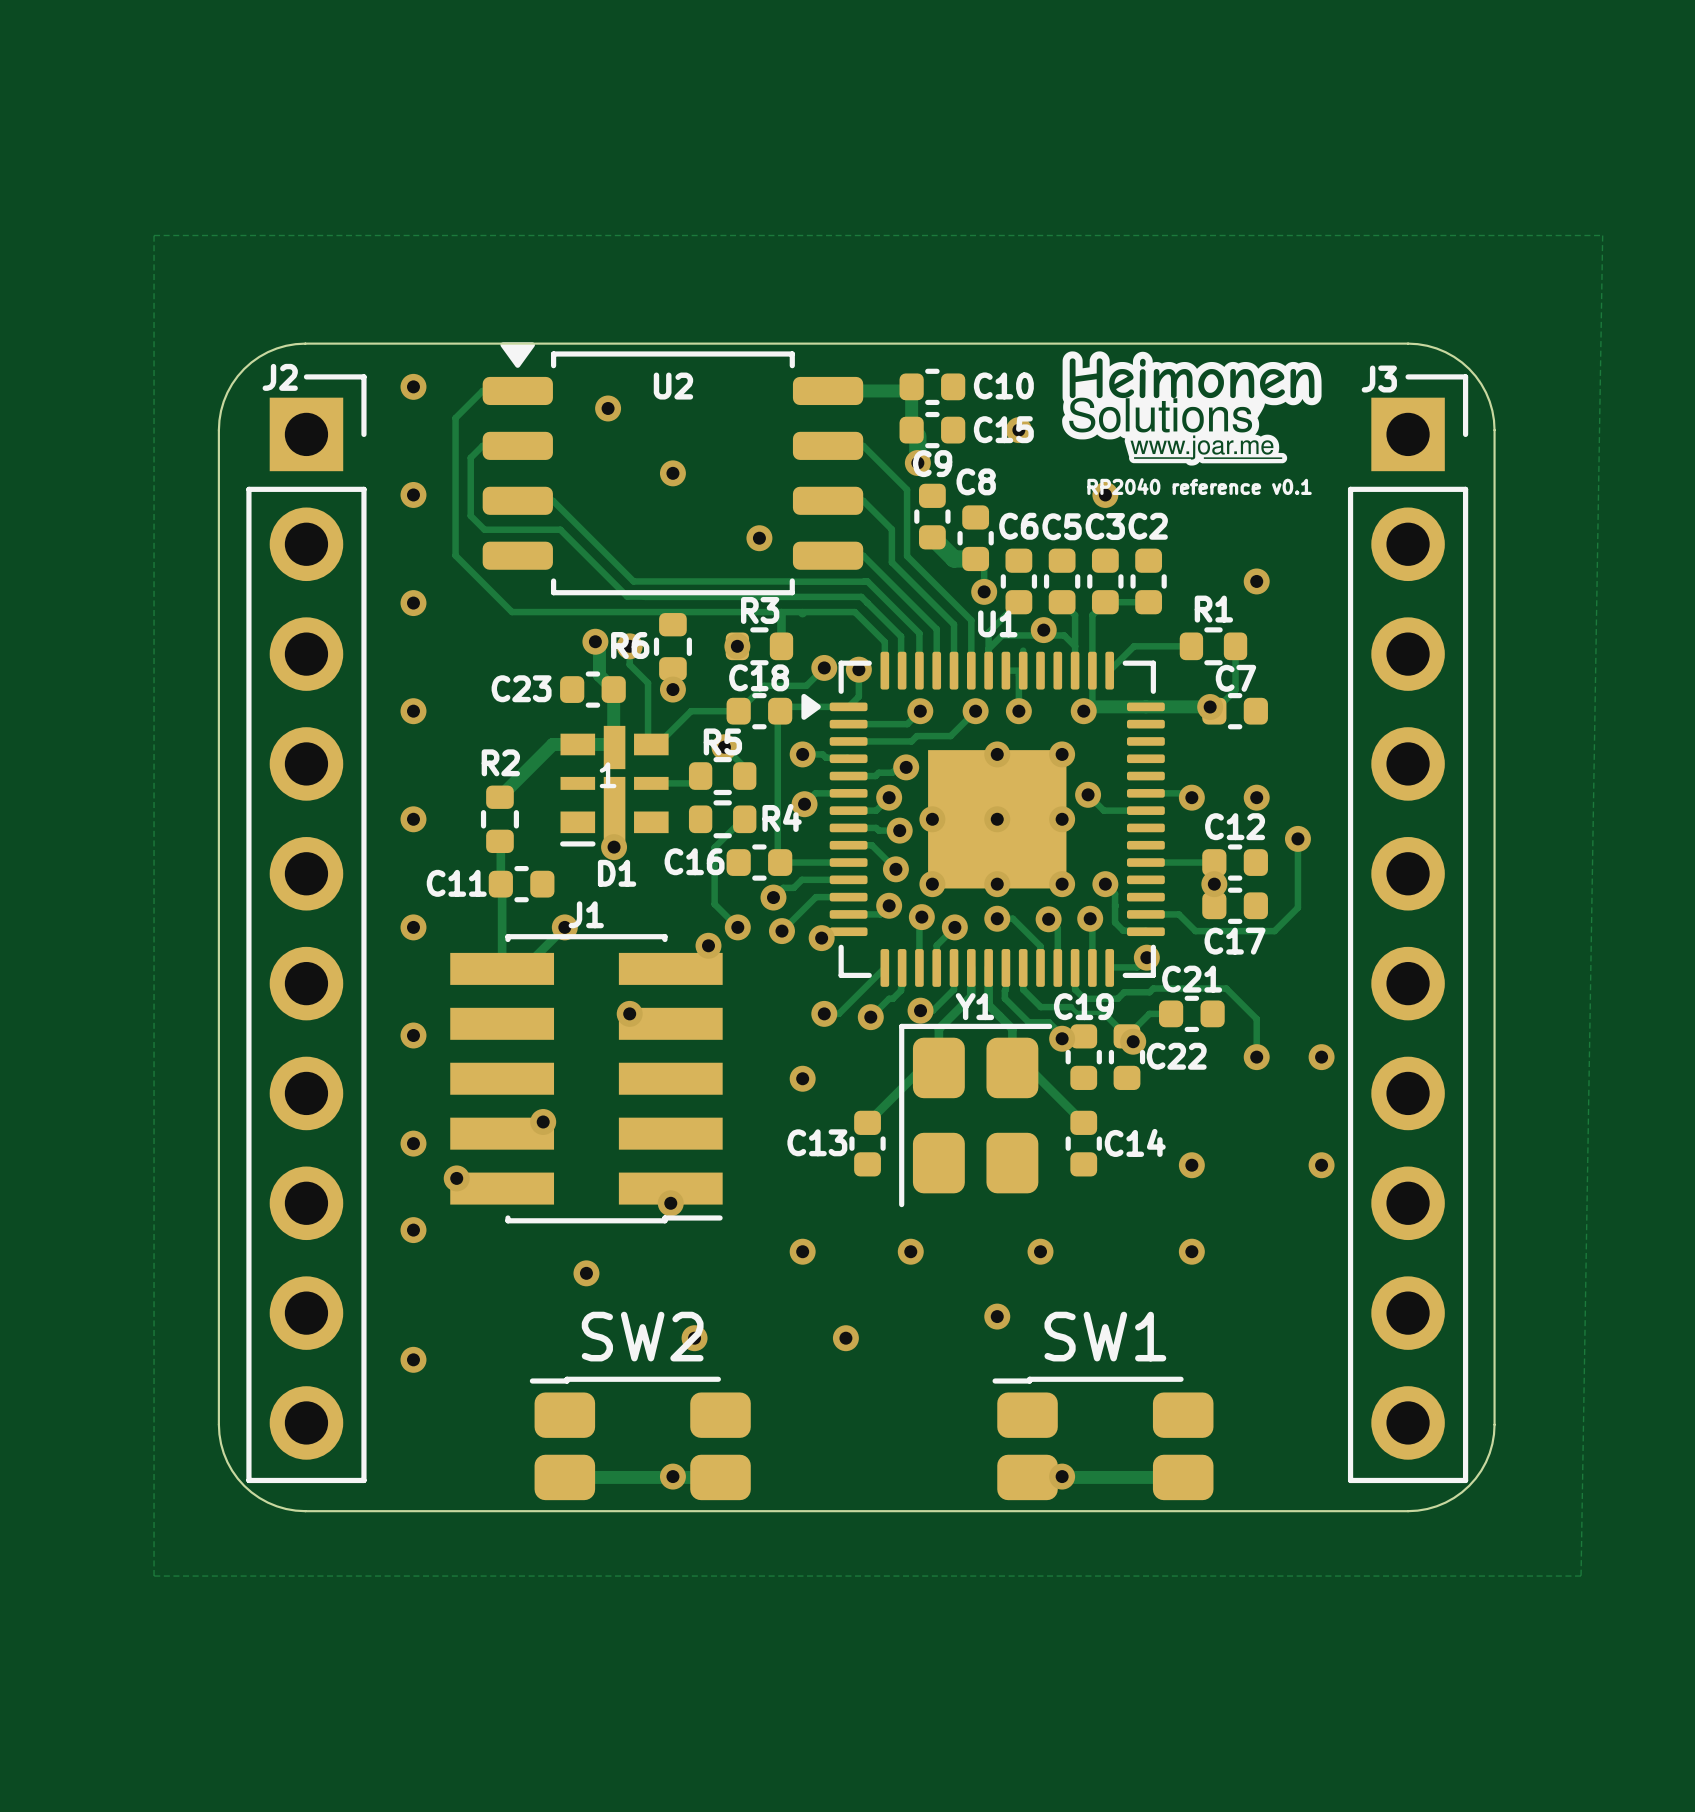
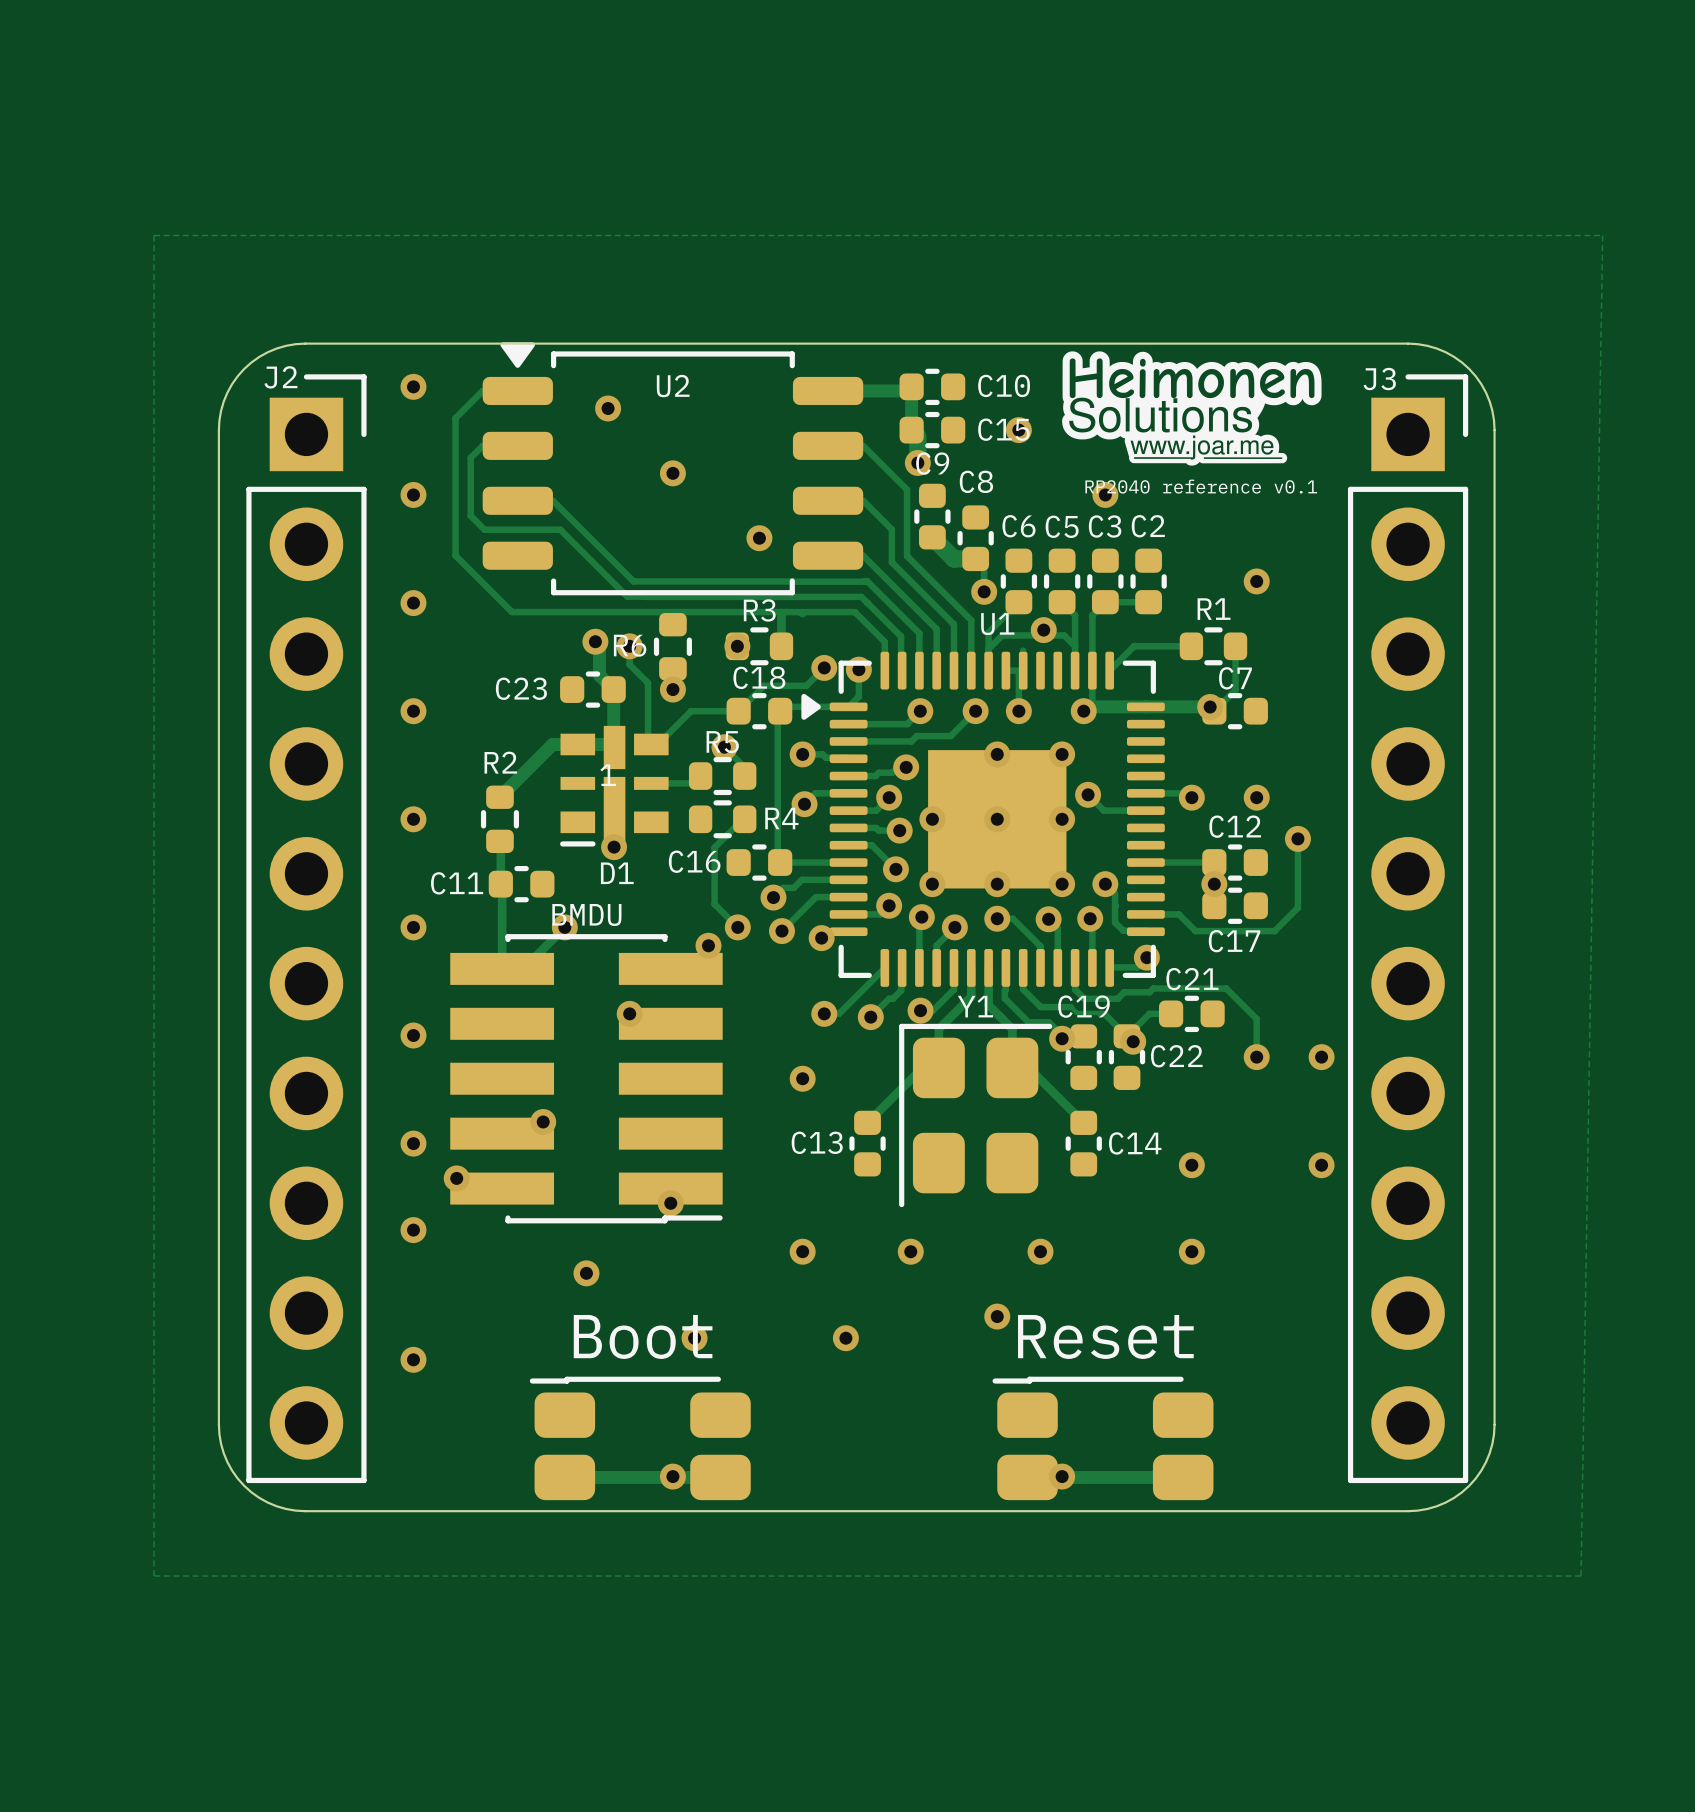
J1 name: J1 (586, 914) -> BMDU (586, 914)
SW2 name: SW2 (642, 1336) -> Boot (643, 1336)
SW1 name: SW1 (1105, 1336) -> Reset (1105, 1336)

